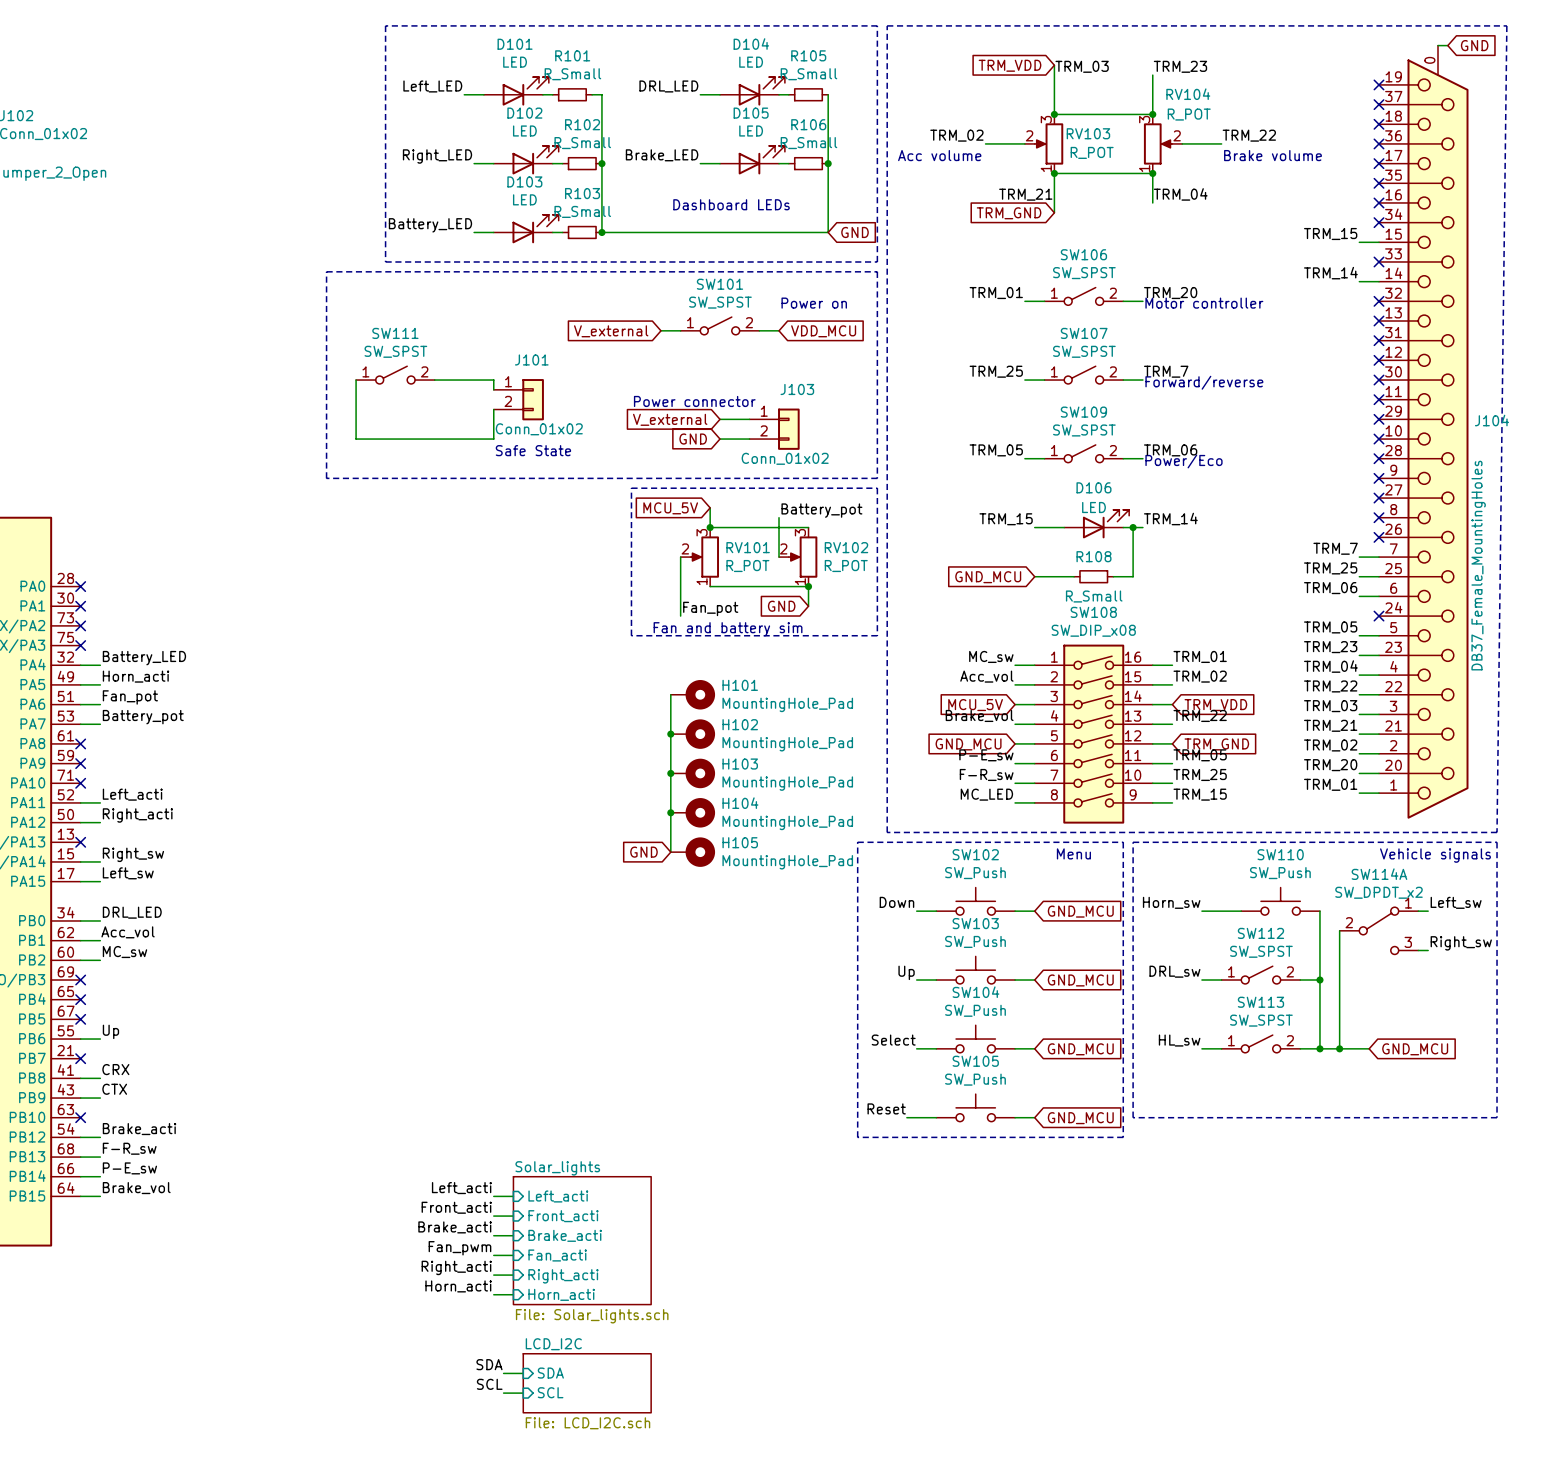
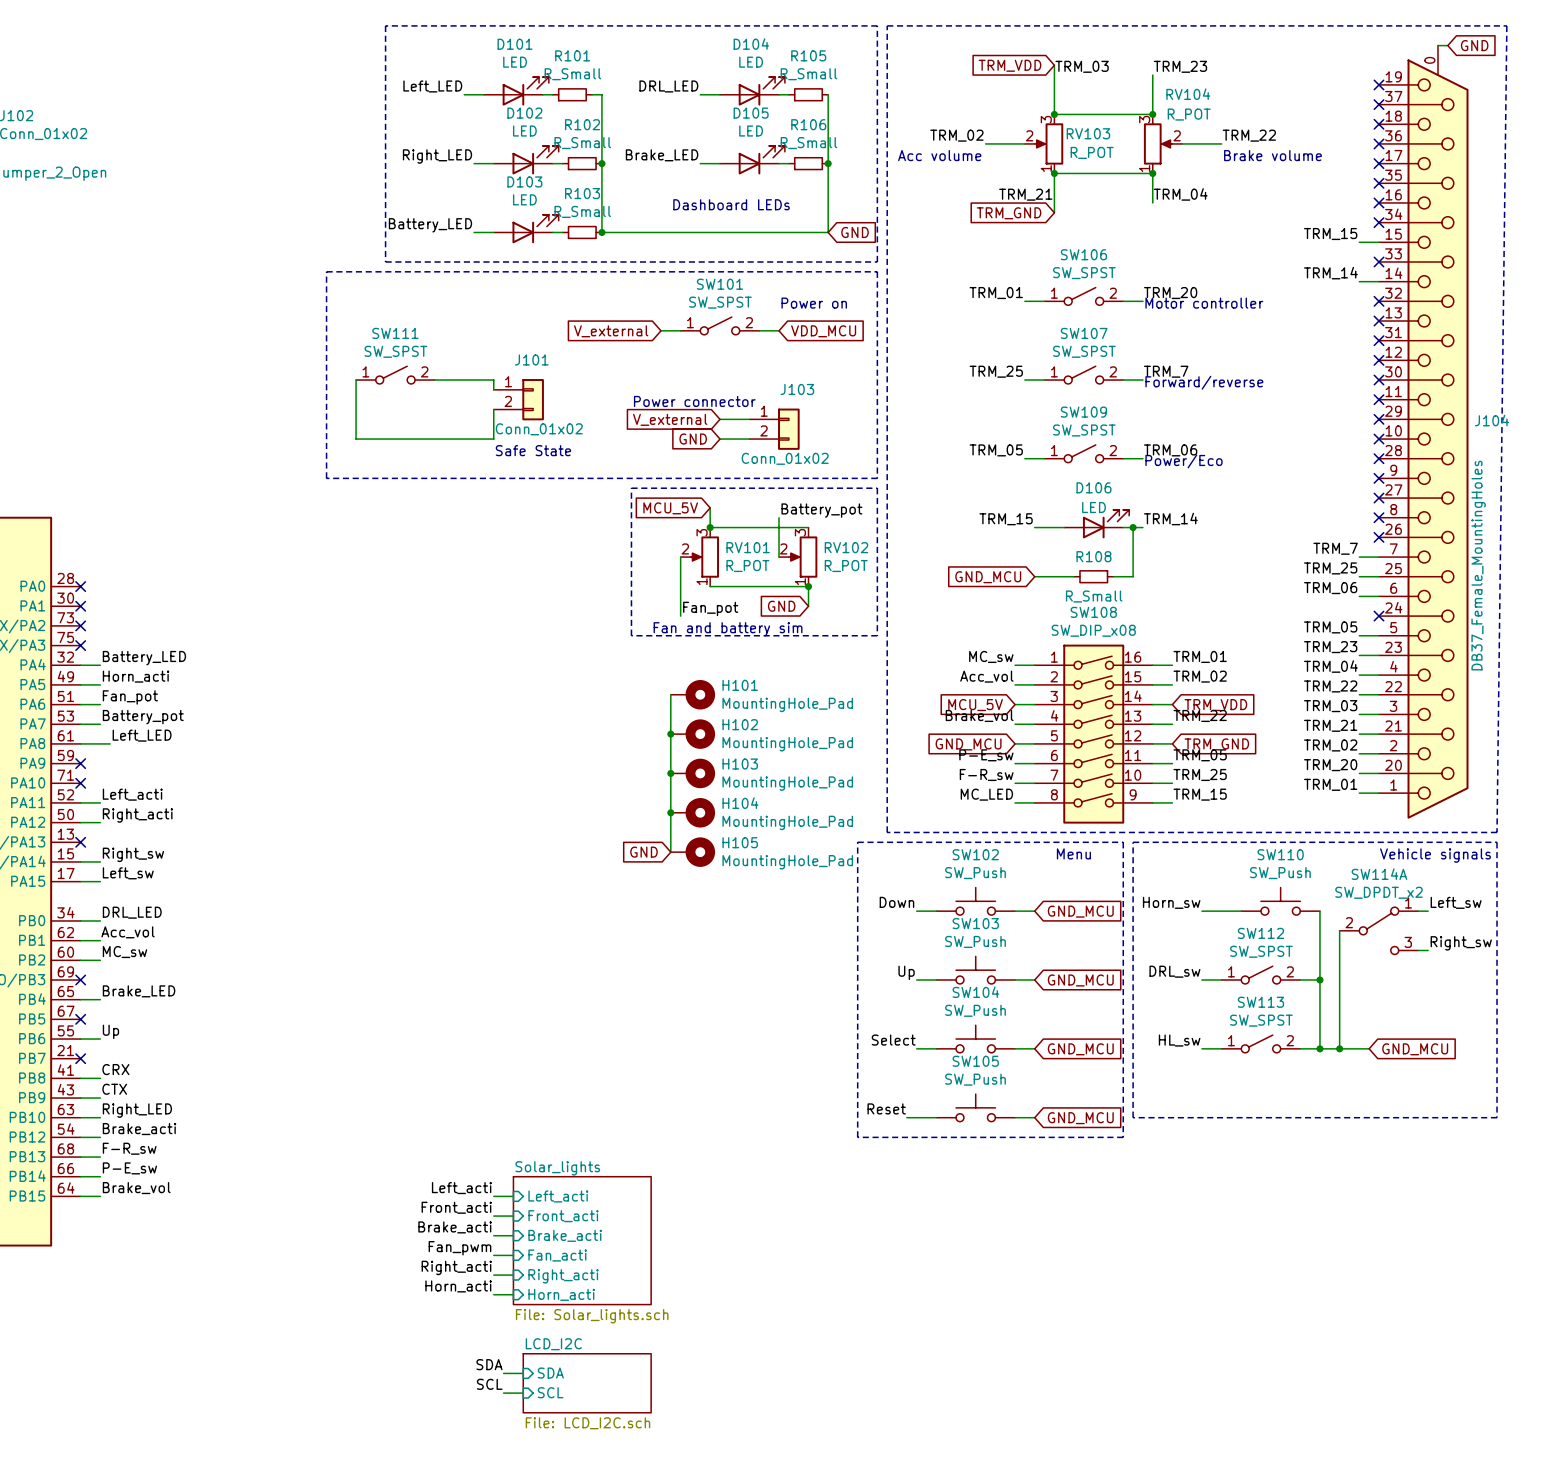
label: none -> Left_LED (142, 735)
wire: none -> (80, 743) (110, 743)
no-connect mark: (80, 743) -> none
label: none -> Brake_LED (139, 991)
wire: none -> (80, 999) (100, 999)
no-connect mark: (80, 999) -> none
label: none -> Right_LED (137, 1110)
wire: none -> (80, 1117) (100, 1117)
no-connect mark: (80, 1117) -> none

